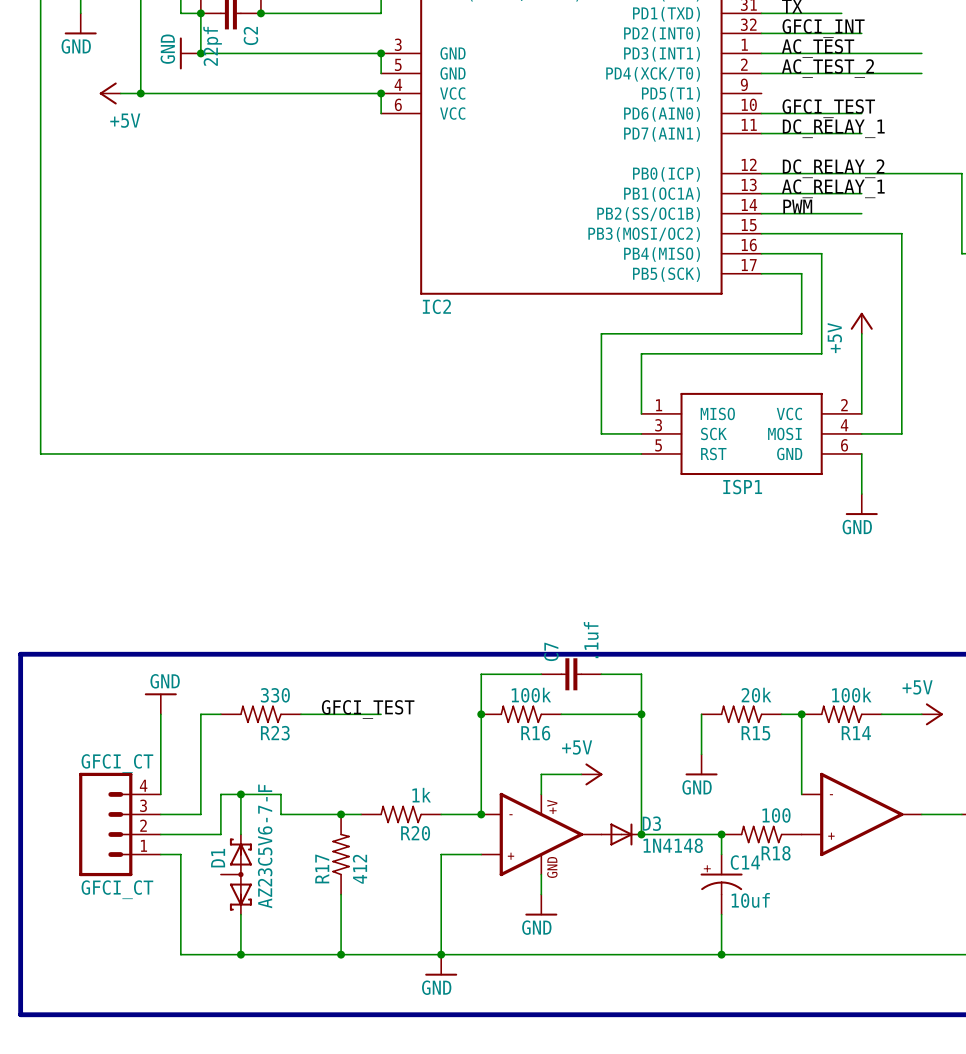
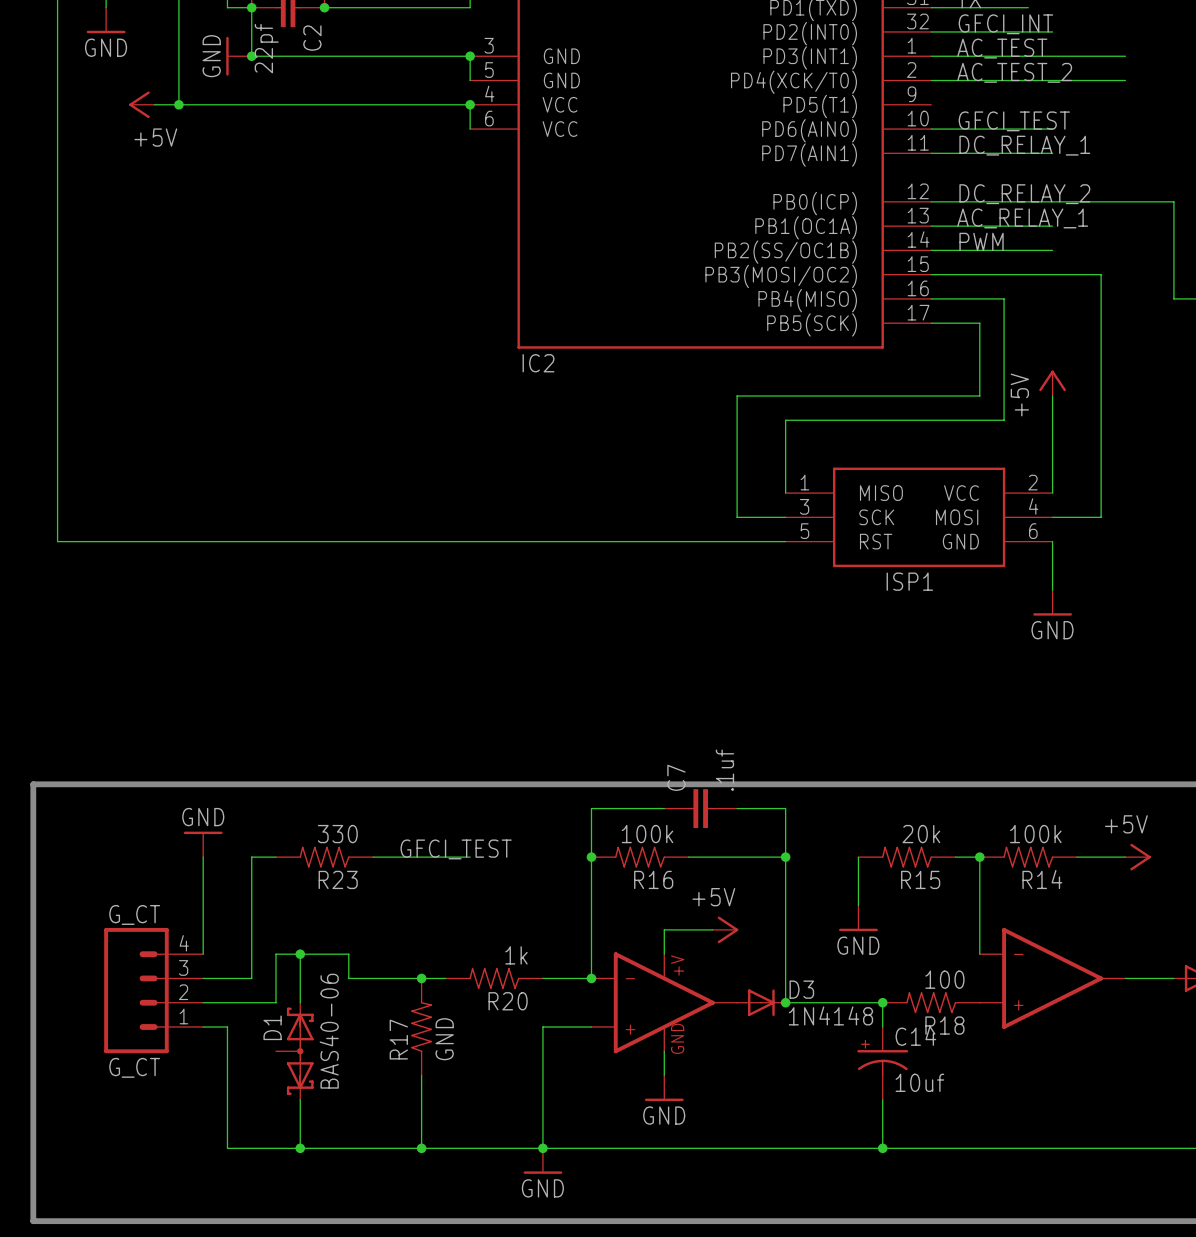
GFCI_CT name: GFCI_CT (117, 763) -> G_CT (134, 914)
D1 value: AZ23C5V6-7-F (265, 846) -> BAS40-06 (329, 1031)
R17 value: 412 (359, 869) -> GND (444, 1039)
GFCI_CT value: GFCI_CT (117, 889) -> G_CT (134, 1067)

